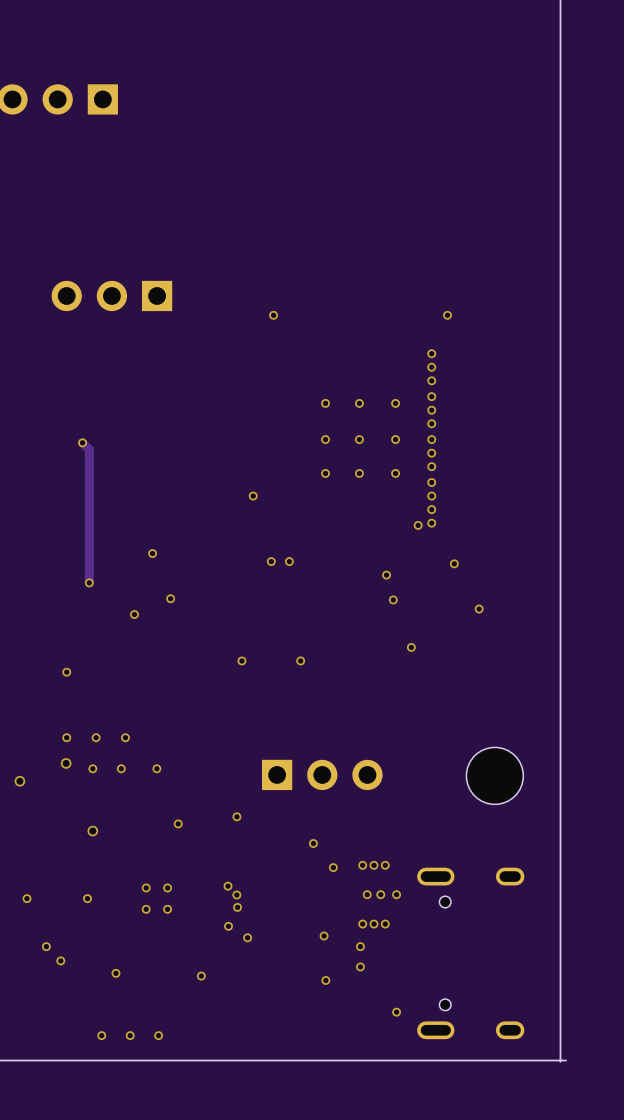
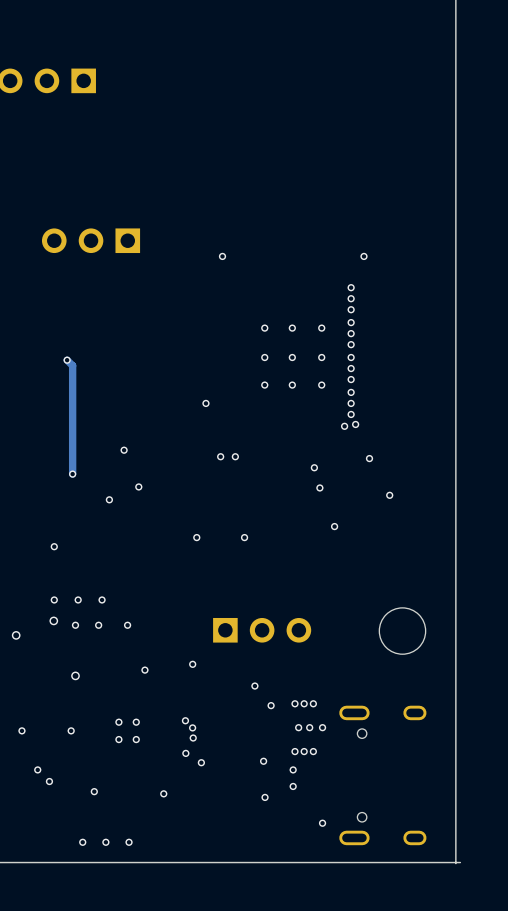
via: none -> (355, 424)
via: (431, 523) -> none
via: none -> (344, 426)
via: (418, 525) -> none

